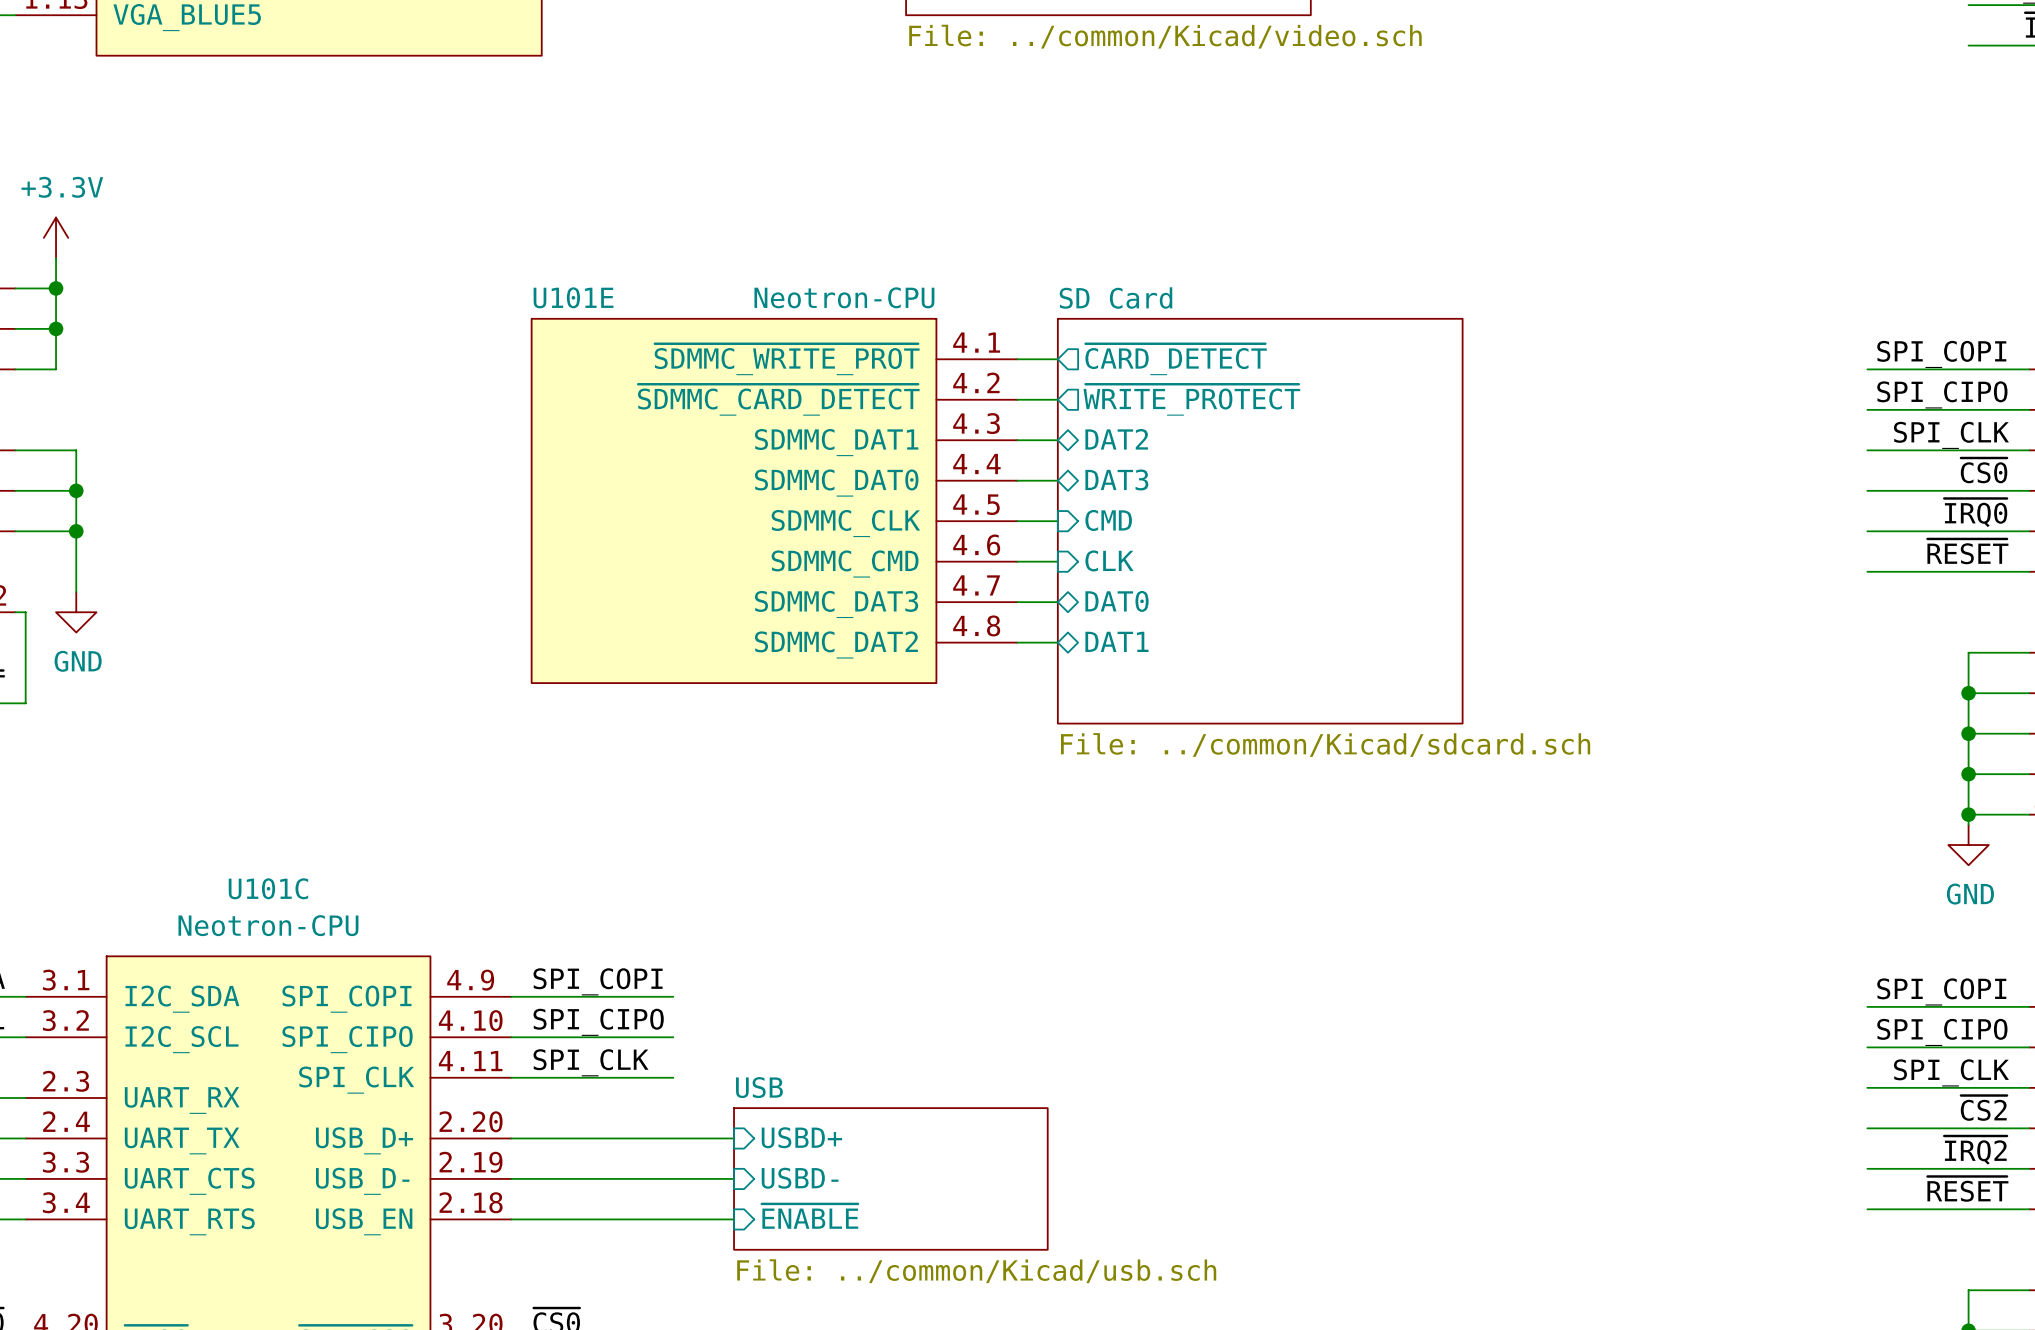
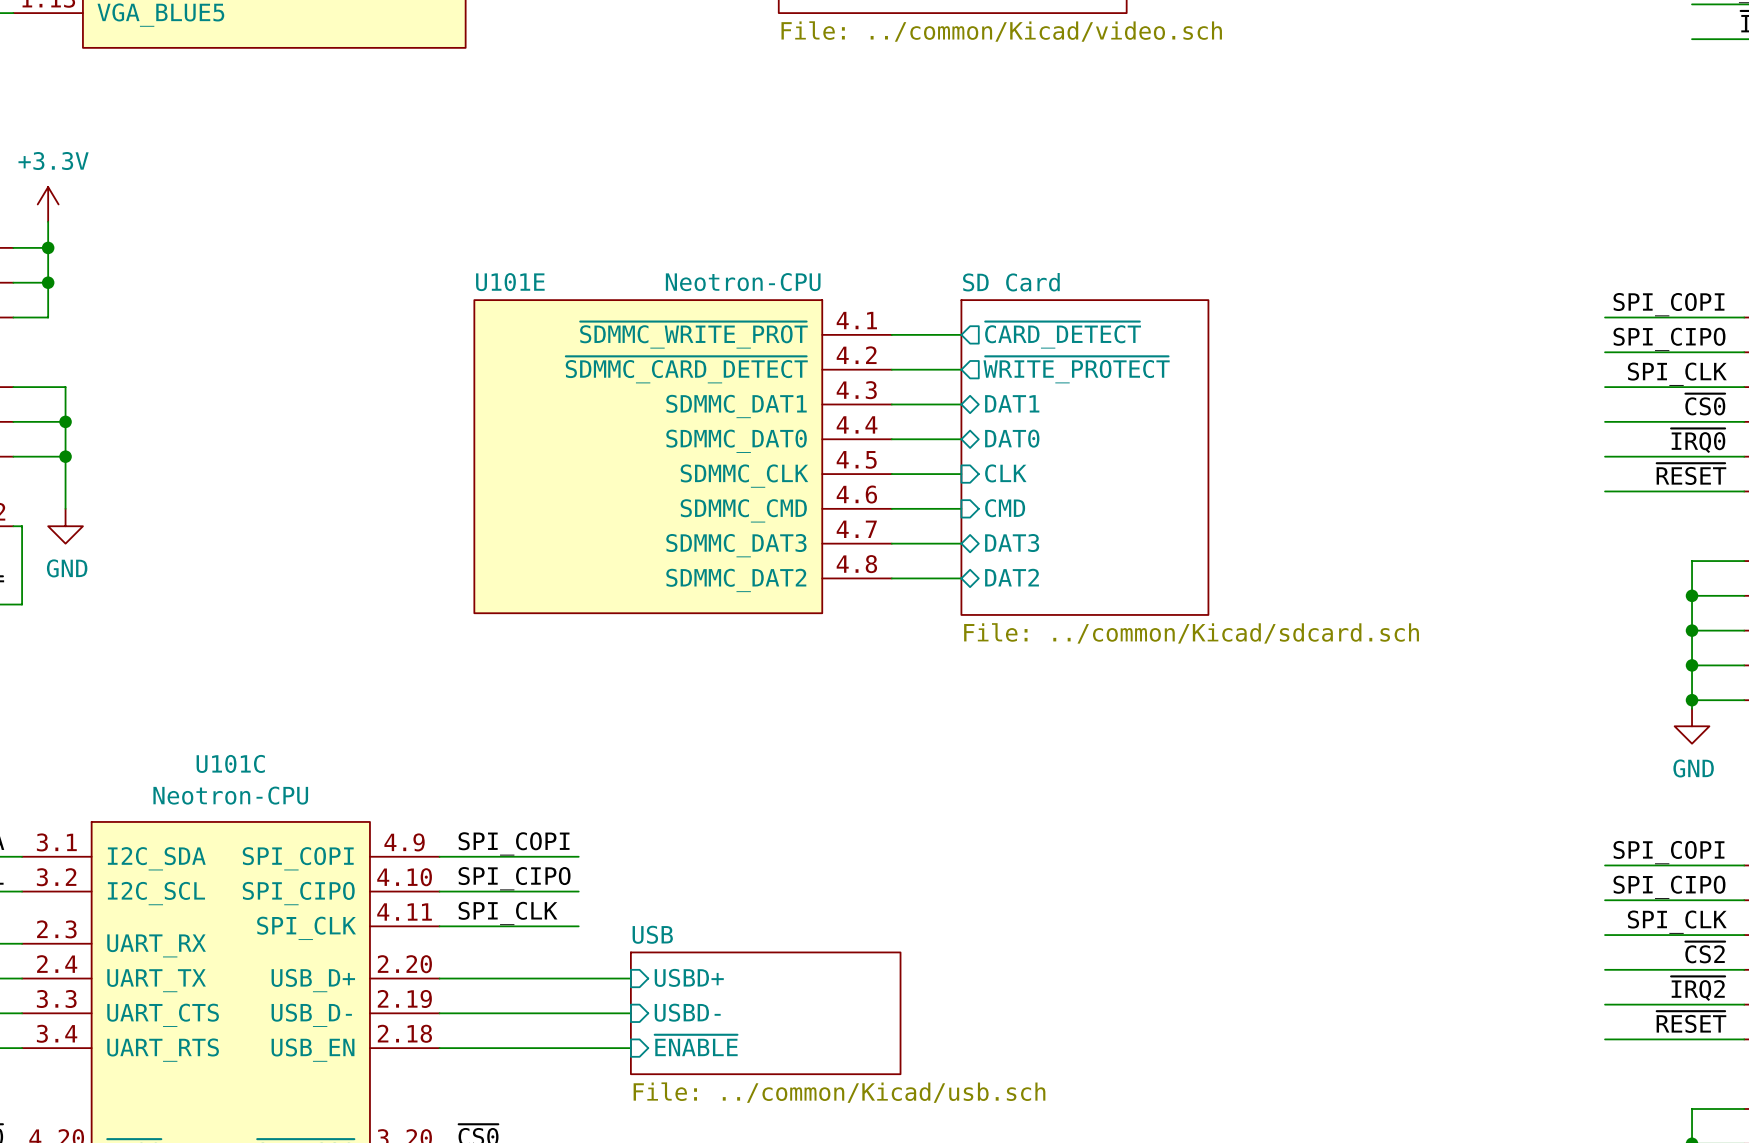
sheet SD Card name position: SD Card (1115, 298) -> SD Card (1011, 282)
sheet SD Card shape: [1057, 318, 1463, 724] -> [961, 300, 1209, 615]
wire: (1017, 359) (1057, 359) -> none
sheet pin position: ~{CARD_DETECT} (1176, 359) -> ~{CARD_DETECT} (1063, 335)
wire: none -> (891, 334) (961, 334)
wire: (1017, 399) (1057, 399) -> none
sheet pin position: ~{WRITE_PROTECT} (1191, 399) -> ~{WRITE_PROTECT} (1076, 369)
wire: none -> (891, 369) (961, 369)
sheet pin position: DAT2 (1116, 439) -> DAT2 (1012, 577)
wire: (1017, 440) (1057, 440) -> none
wire: none -> (891, 404) (961, 404)
sheet pin position: DAT3 (1116, 479) -> DAT3 (1012, 543)
wire: (1017, 480) (1057, 480) -> none
U101E position: (774, 500) -> (683, 456)
wire: none -> (891, 439) (961, 439)
sheet pin position: CMD (1108, 520) -> CMD (1005, 508)
wire: (1017, 521) (1057, 521) -> none
wire: none -> (891, 474) (961, 474)
sheet pin position: CLK (1109, 560) -> CLK (1005, 473)
wire: (1017, 561) (1057, 561) -> none
wire: none -> (891, 508) (961, 508)
sheet pin position: DAT0 (1117, 601) -> DAT0 (1012, 438)
wire: (1017, 602) (1057, 602) -> none
wire: none -> (891, 543) (961, 543)
sheet pin position: DAT1 (1116, 641) -> DAT1 (1012, 403)
wire: (1017, 642) (1057, 642) -> none
wire: none -> (891, 578) (961, 578)
sheet SD Card value position: File: ../common/Kicad/sdcard.sch (1325, 745) -> File: ../common/Kicad/sdcard.sch (1191, 633)

